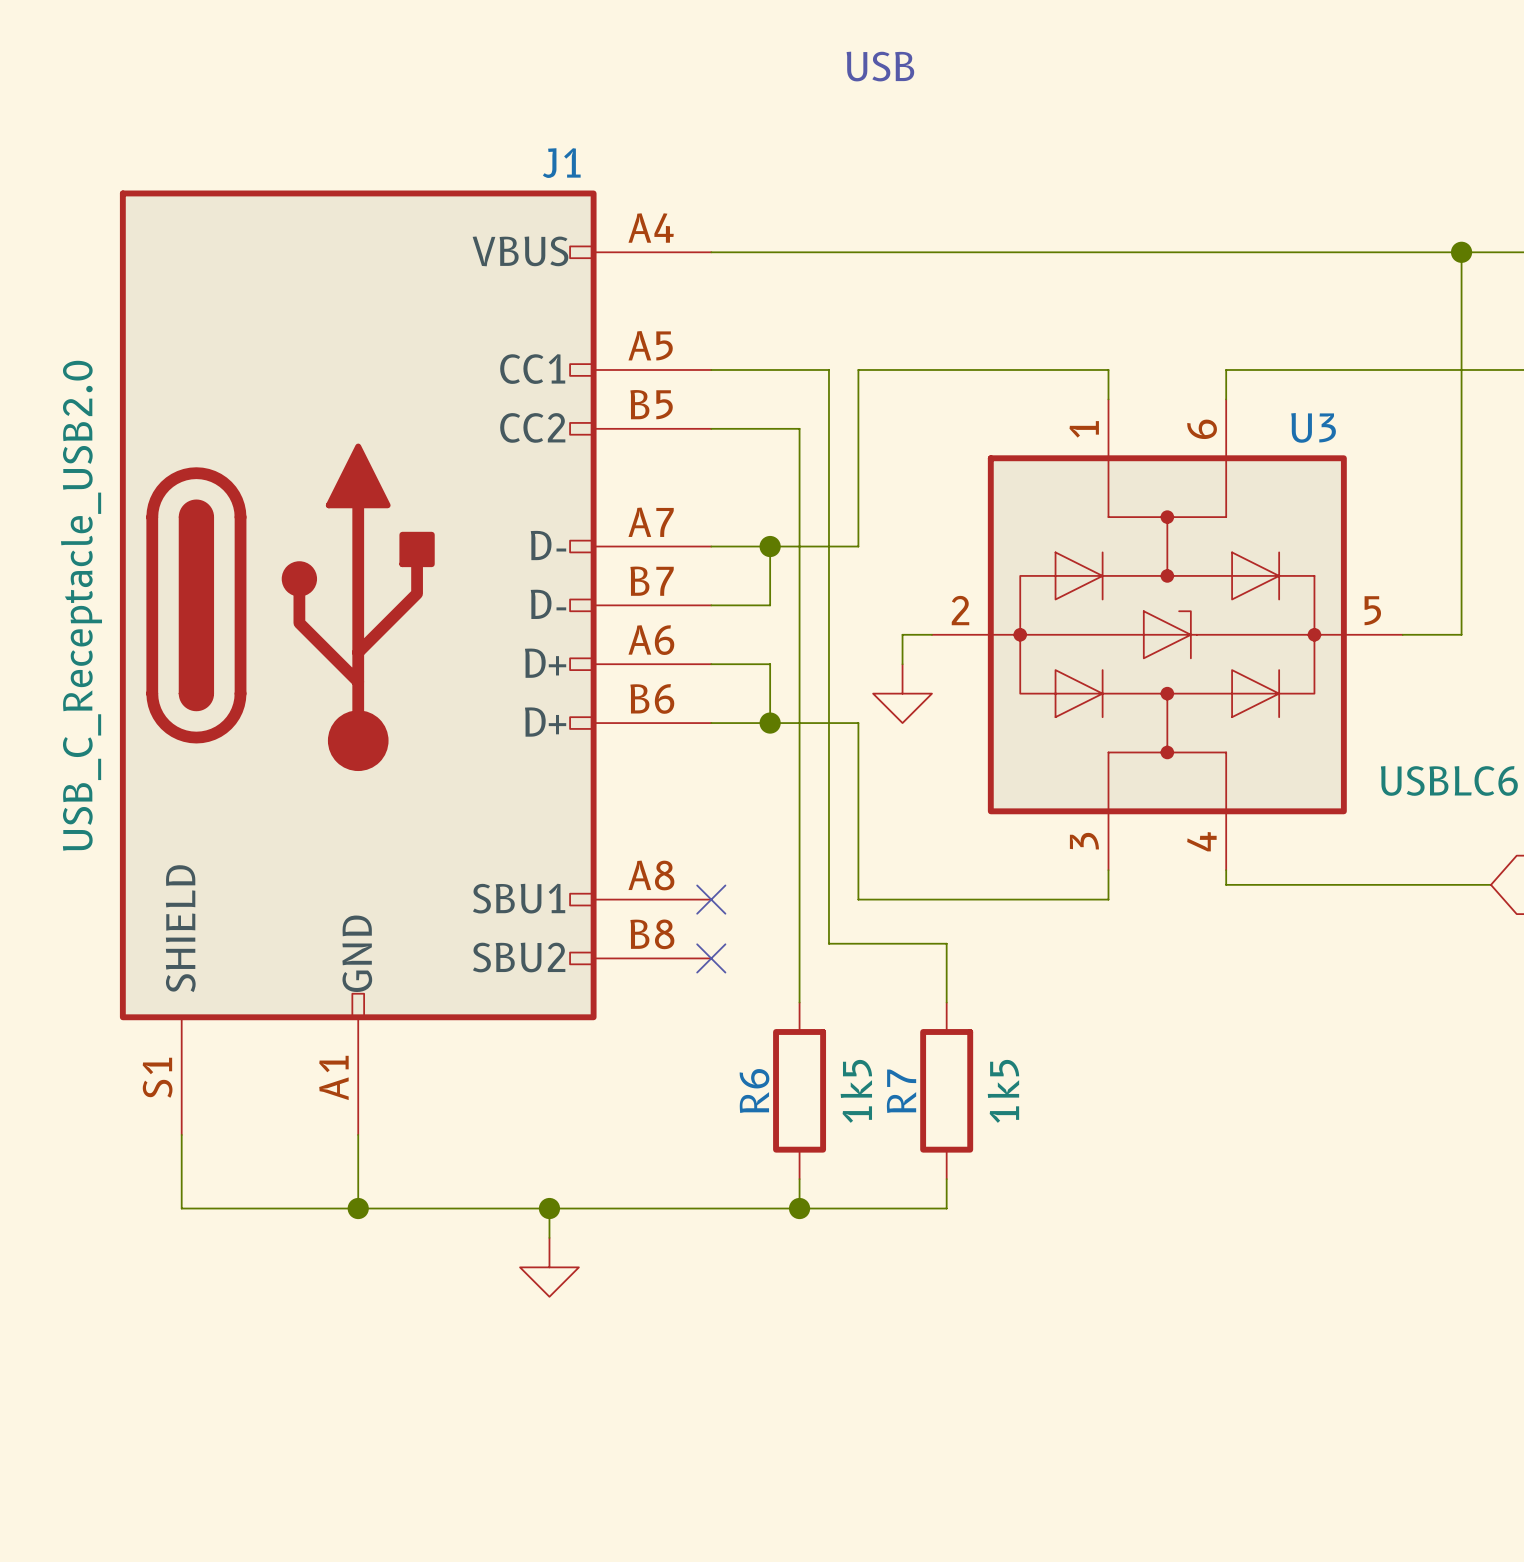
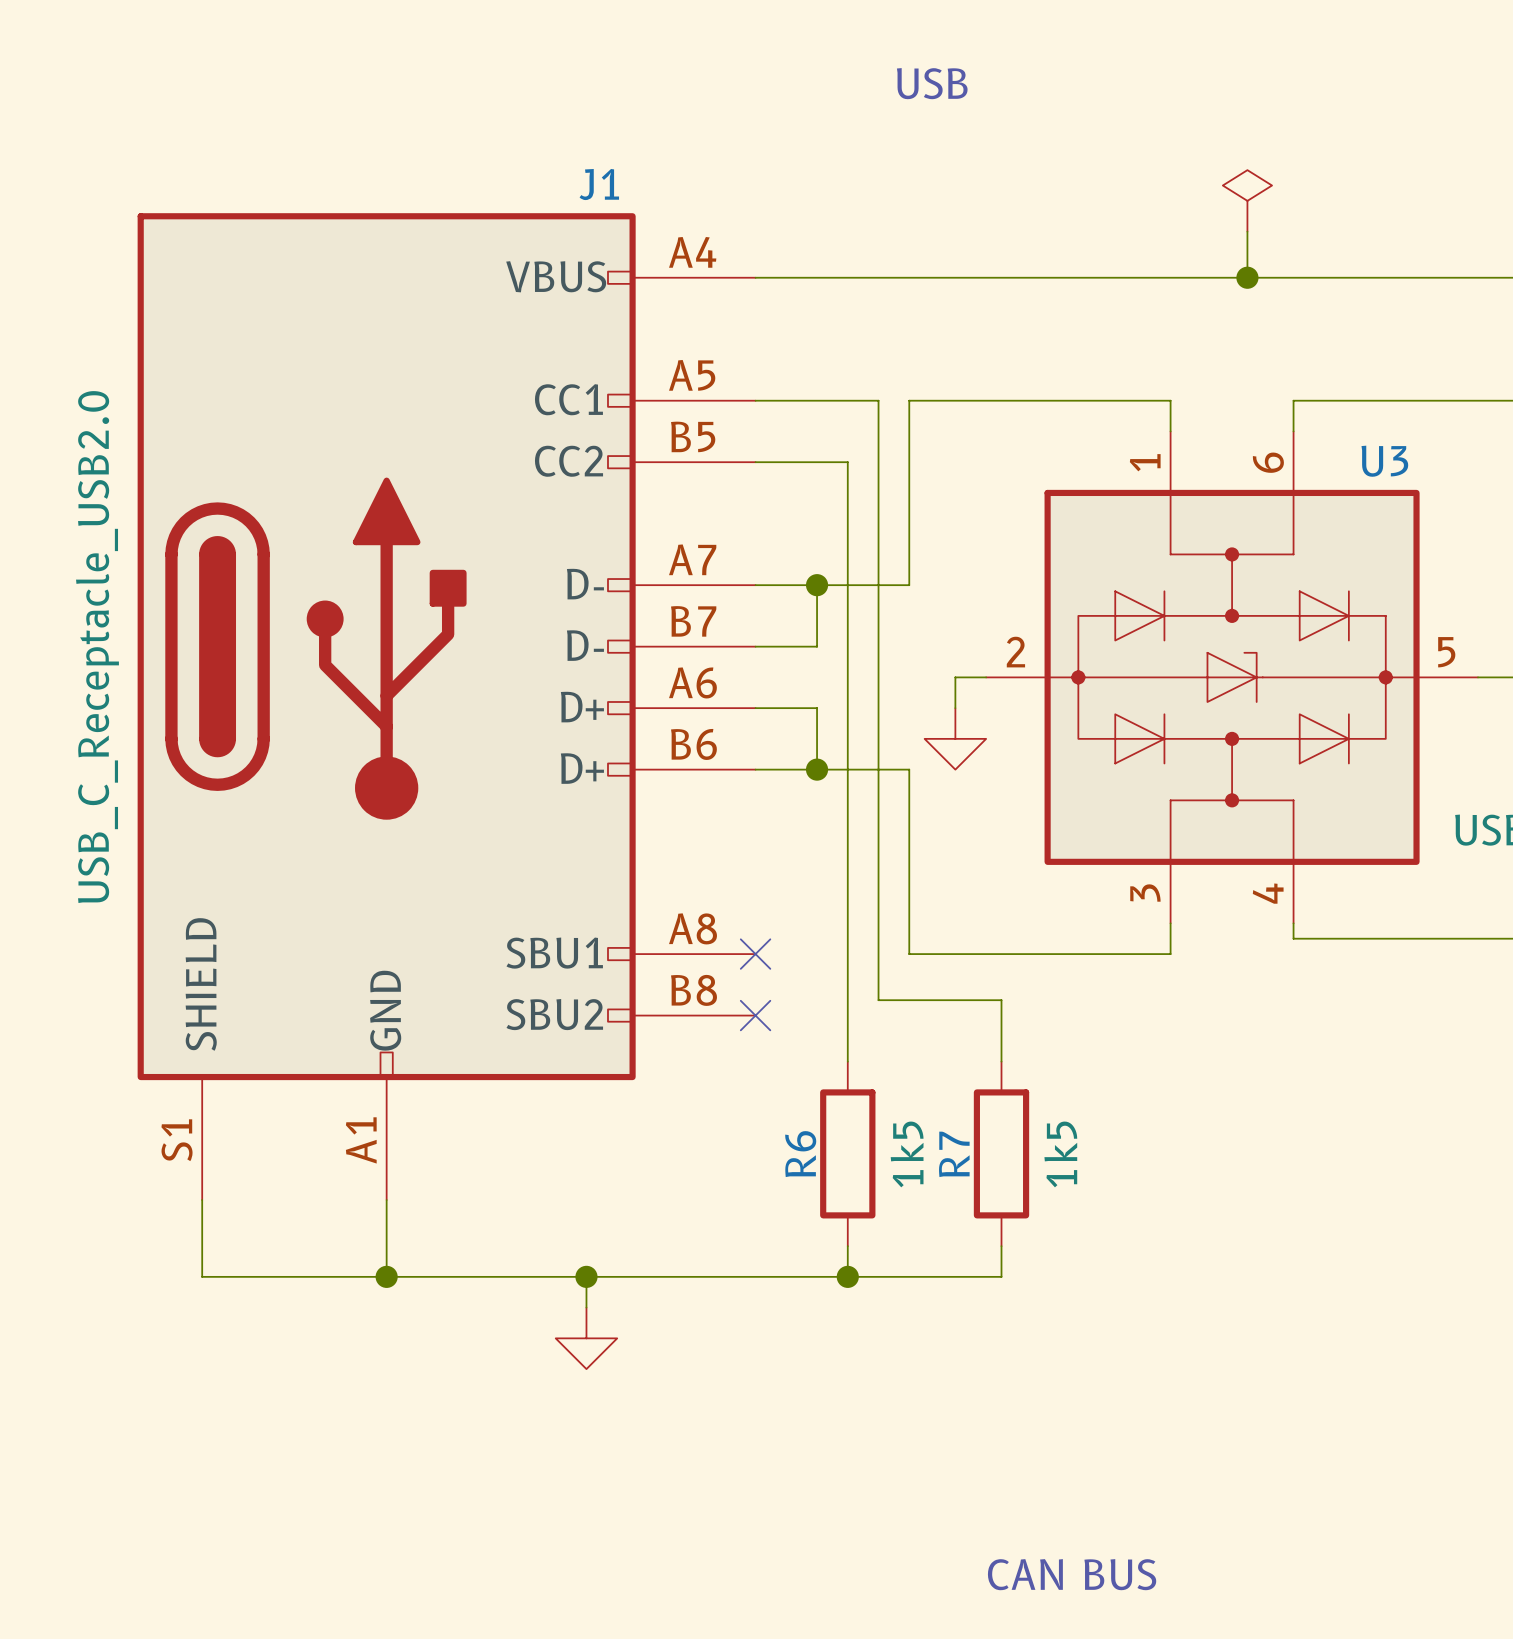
power symbol: none -> (1247, 200)
wire: none -> (1247, 231) (1247, 277)
junction: none -> (1247, 277)
text: none -> CAN BUS (1072, 1574)

